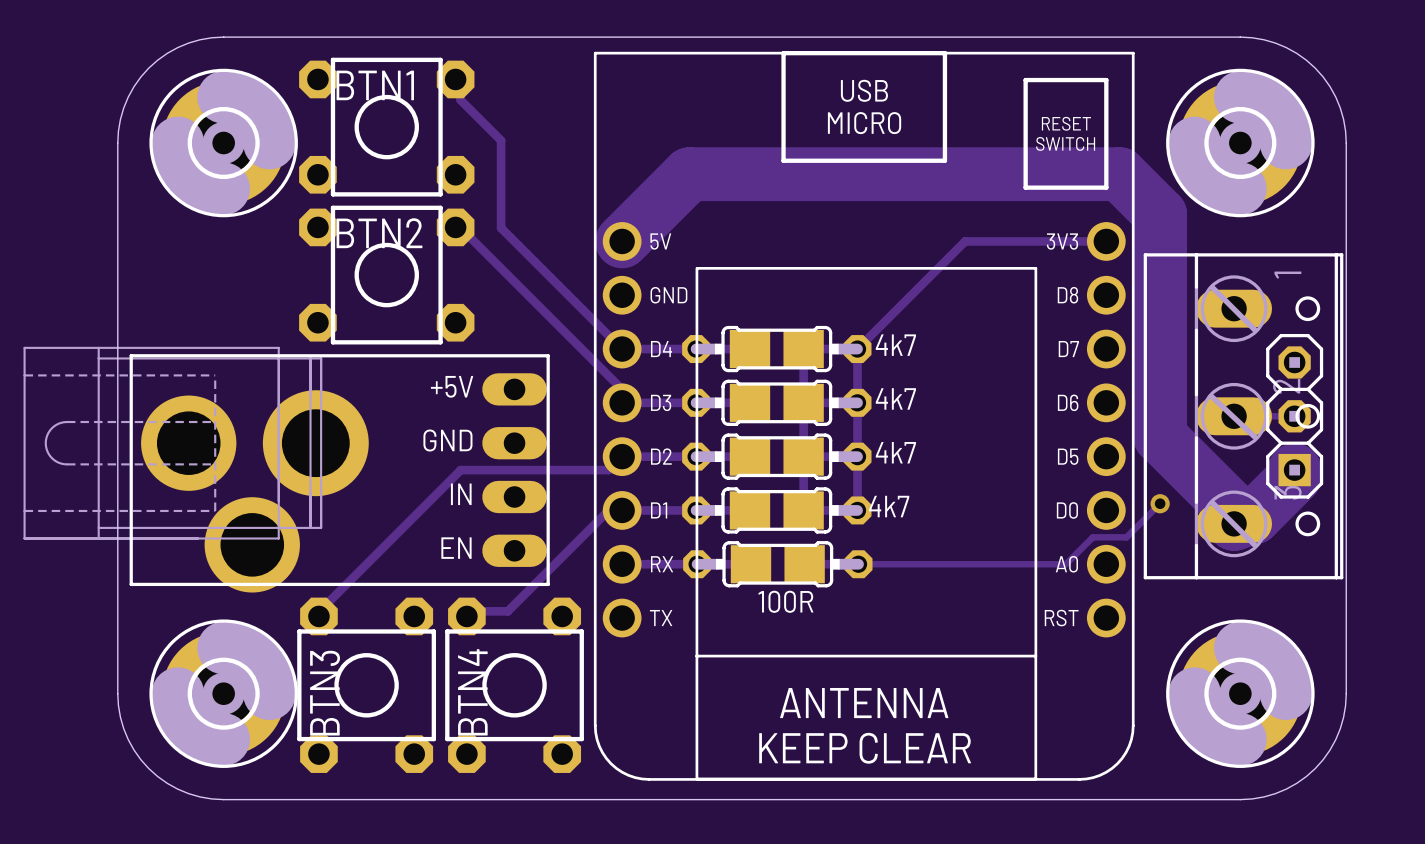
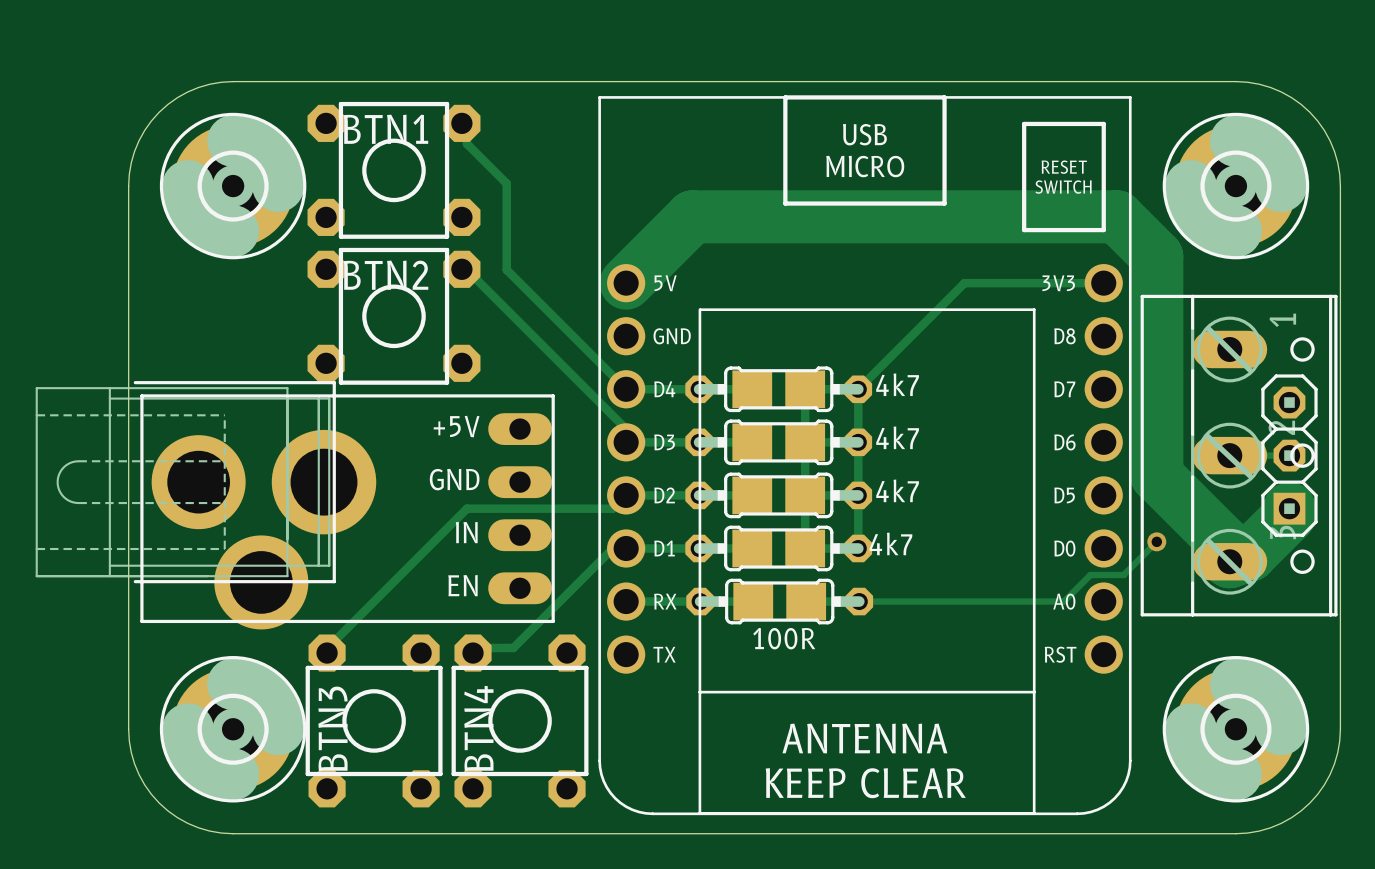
line: none -> (135, 382) (334, 382) (334, 581) (135, 581)

